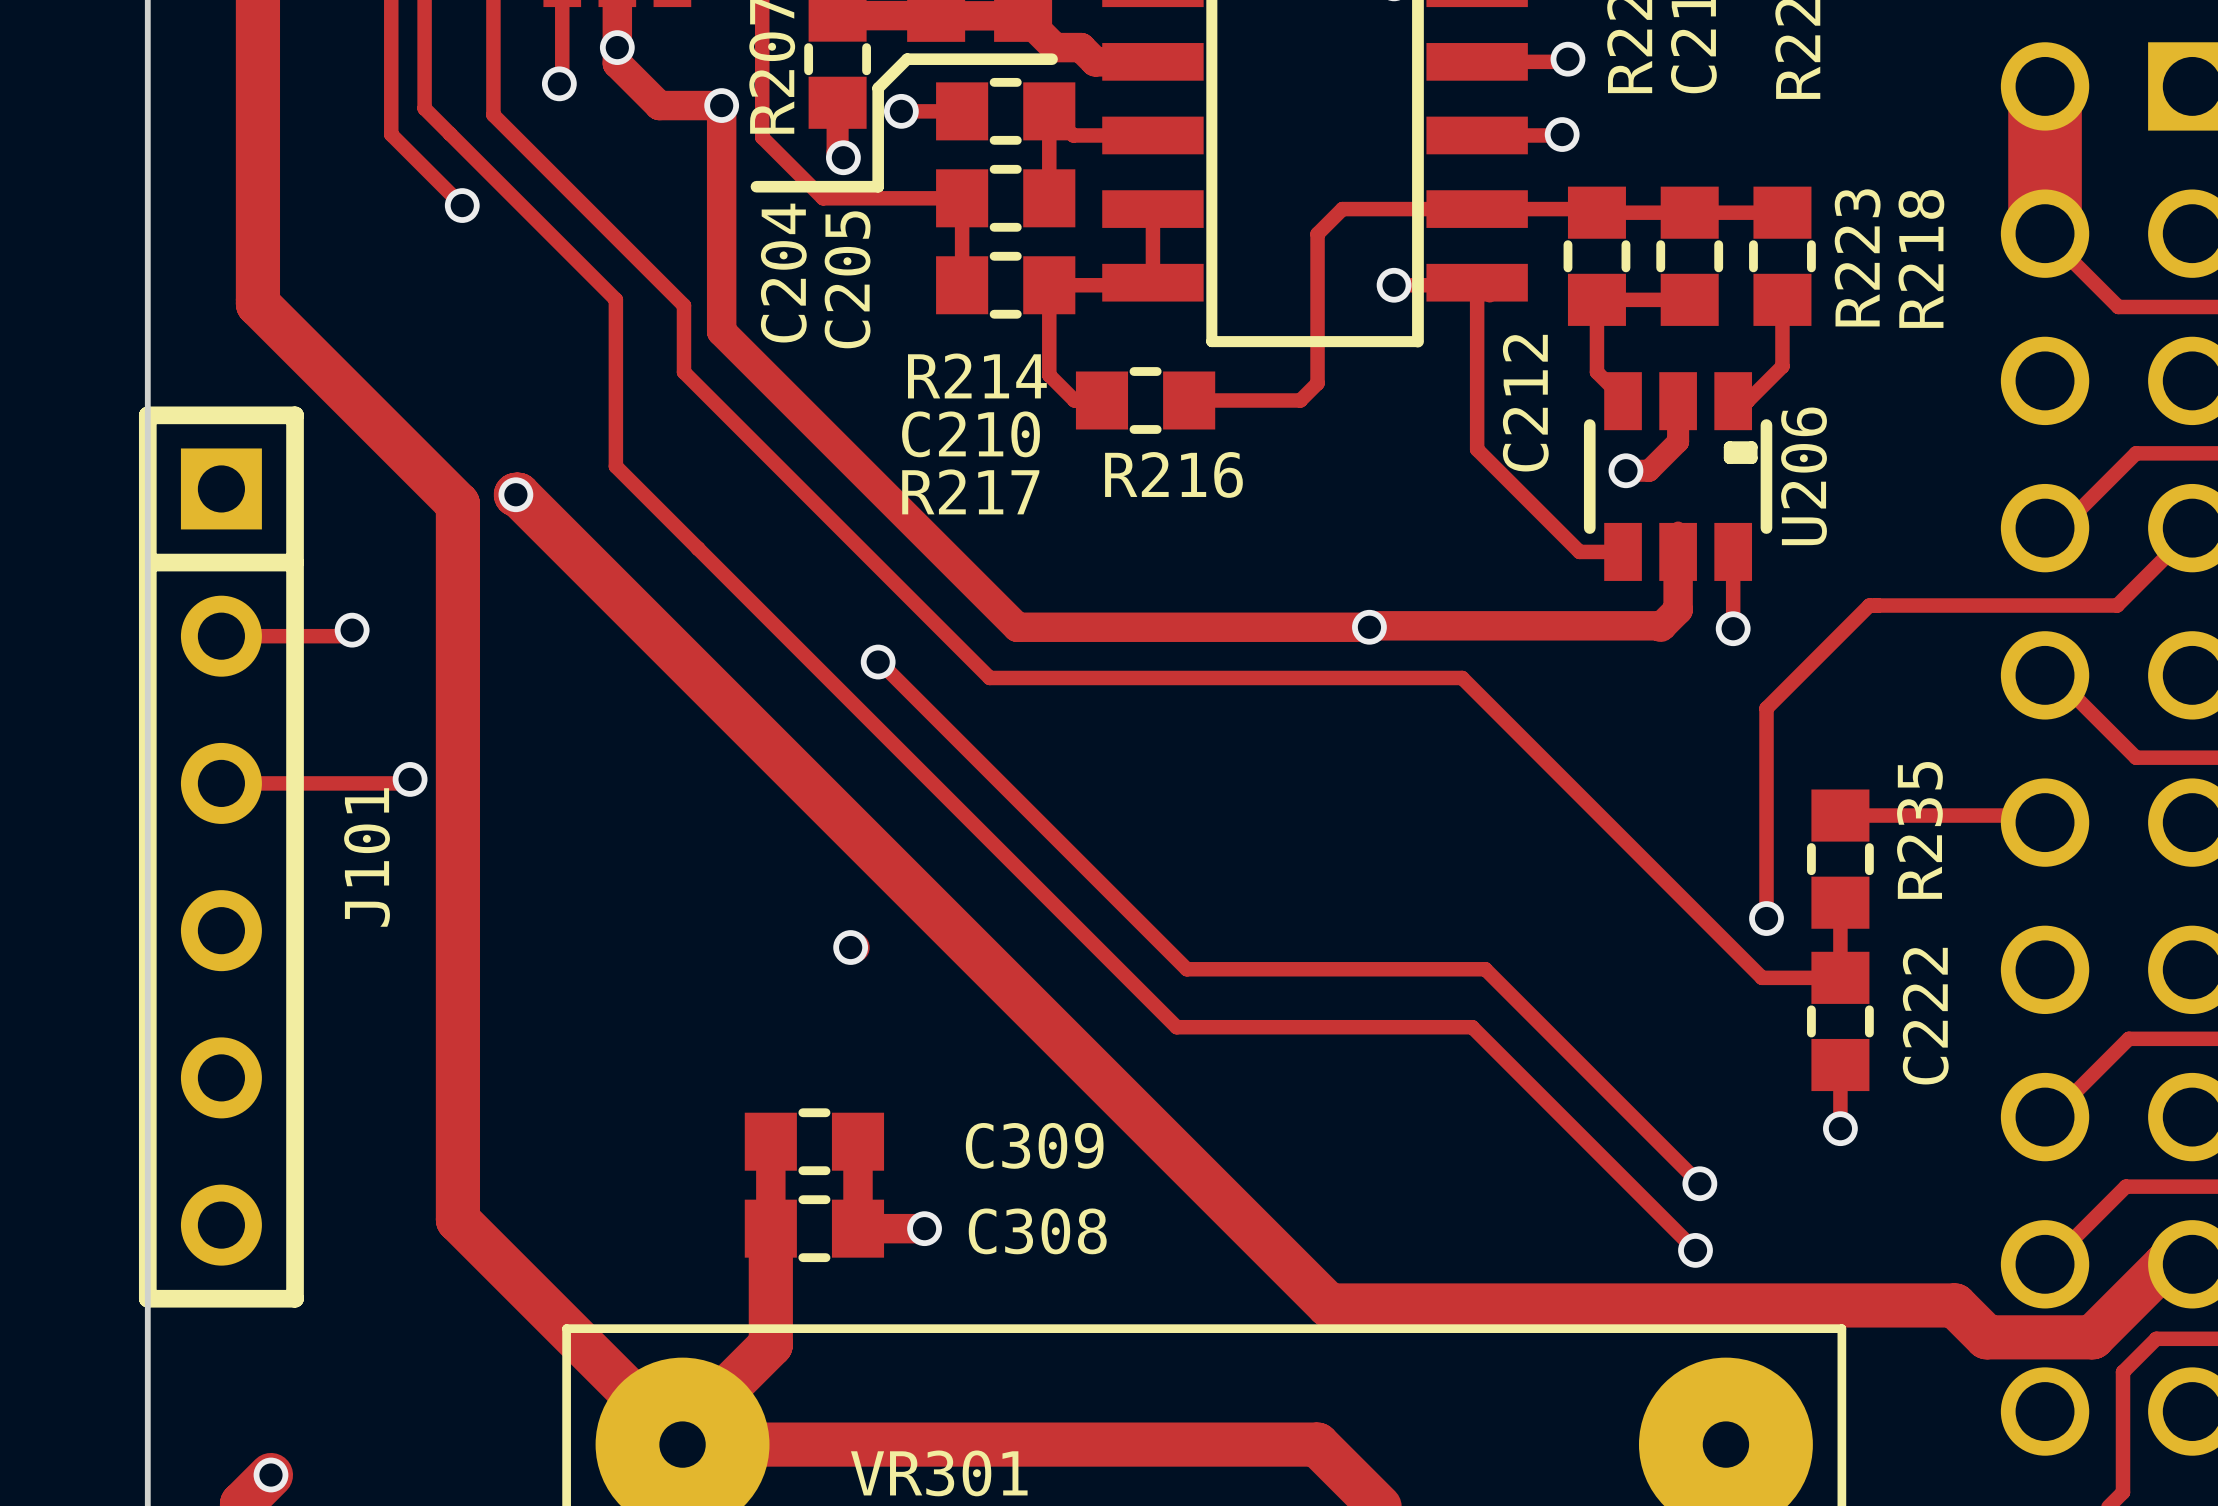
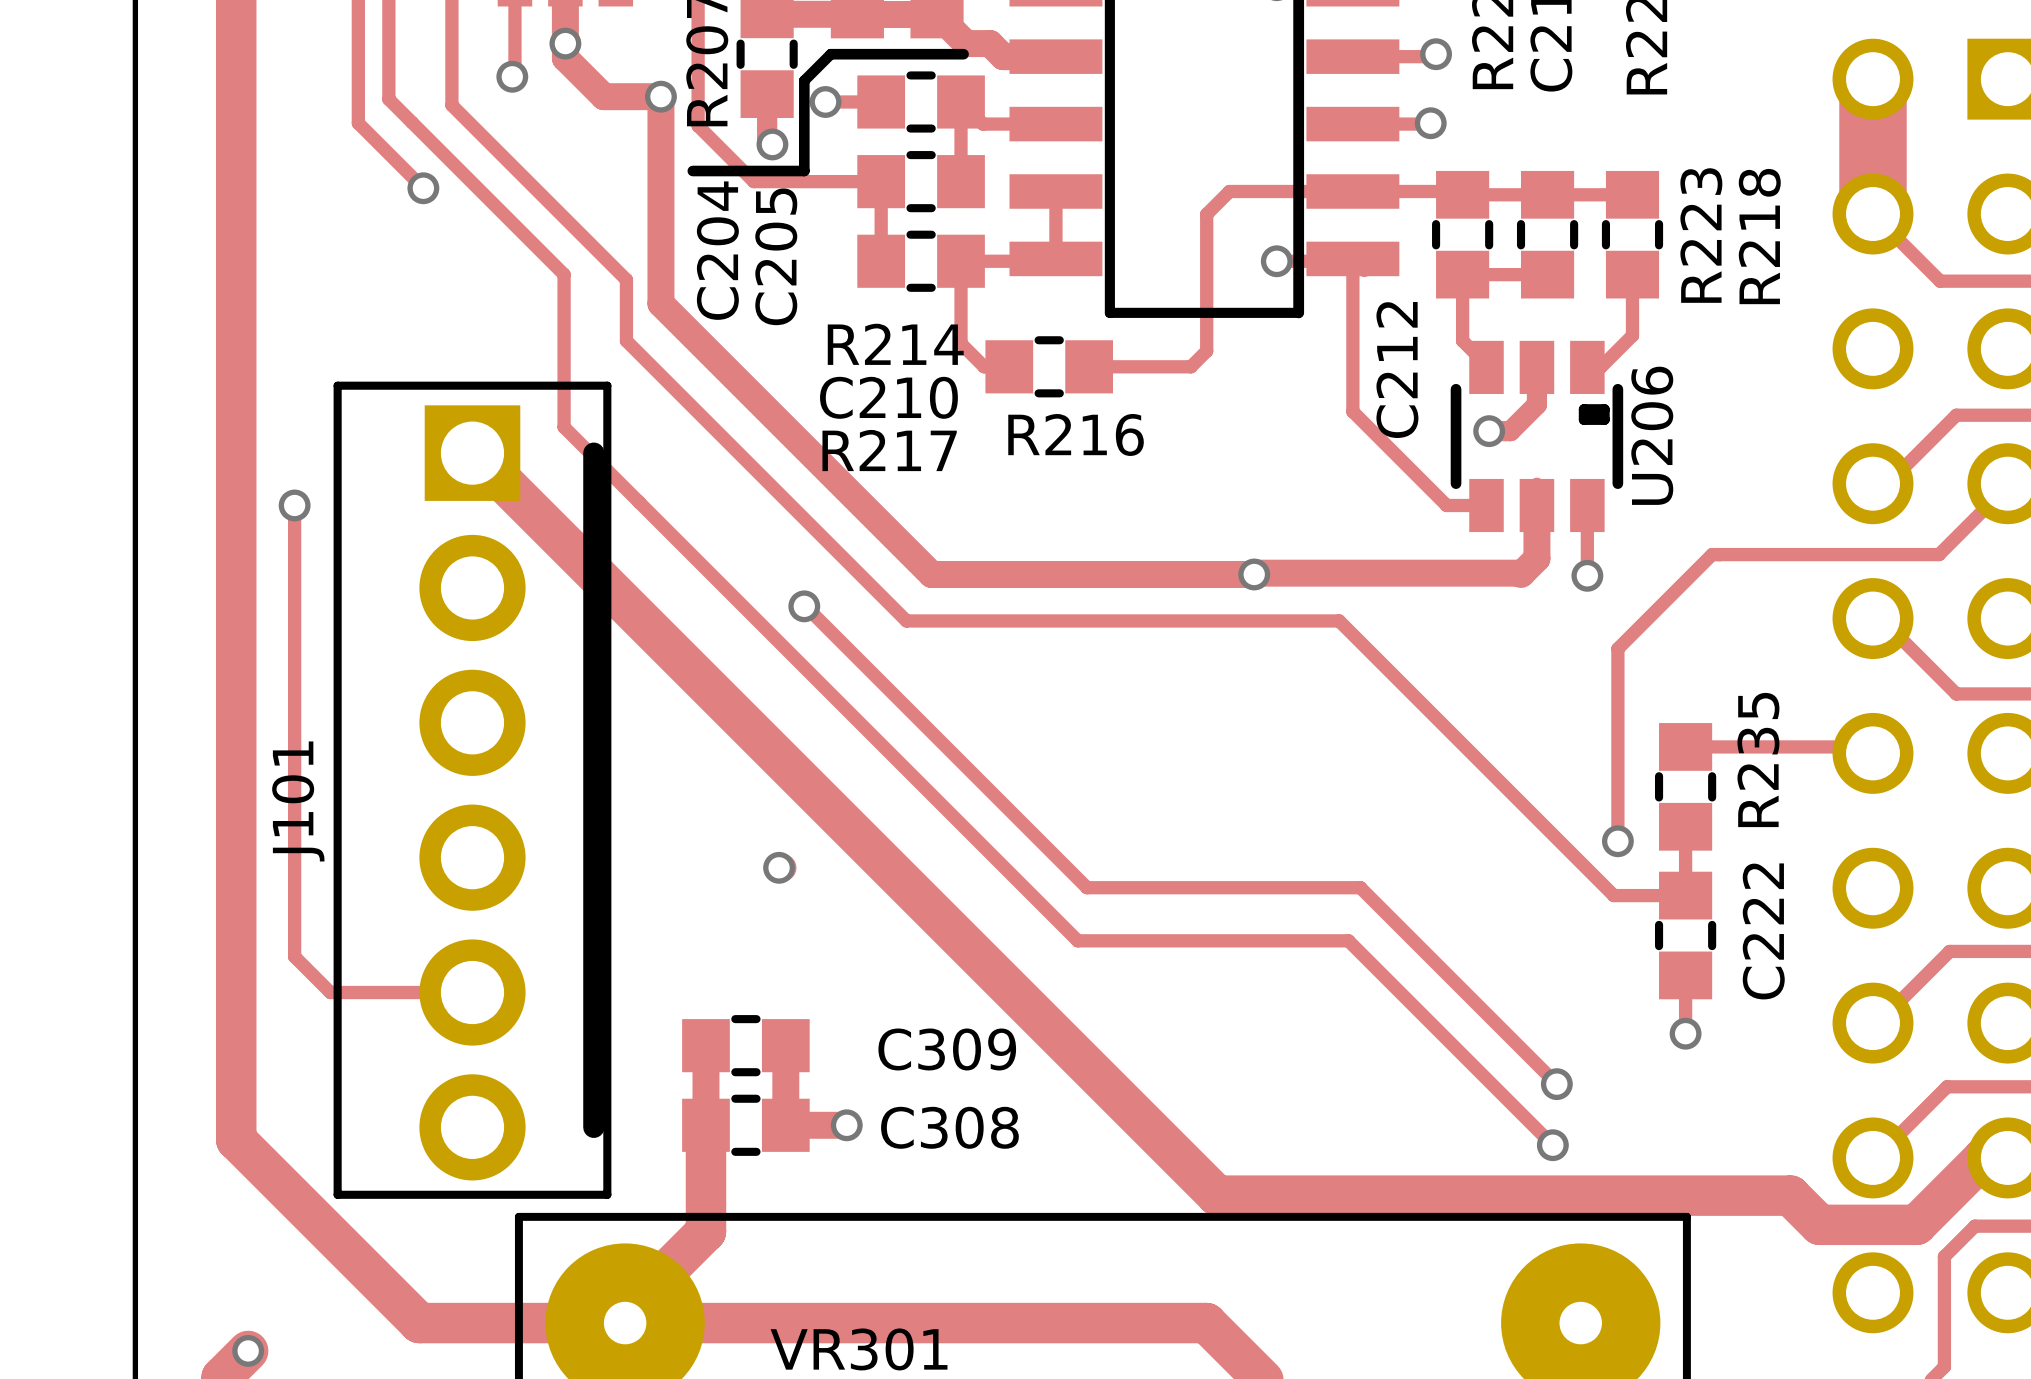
track: (257, 304) (457, 504) (457, 1219) (682, 1444) -> (236, 278) (236, 1139) (419, 1323) (625, 1323)
J101 footprint: [138, 406, 304, 1308] -> [333, 381, 612, 1199]
via: (515, 494) -> none
track: none -> (294, 505) (294, 956) (330, 992) (472, 992)
track: (352, 630) (346, 636) (221, 636) -> none
via position: (352, 630) -> (294, 505)
track: (410, 779) (406, 783) (221, 783) -> none
via: (410, 779) -> none
J101 name position: J101 (367, 857) -> J101 (298, 801)

